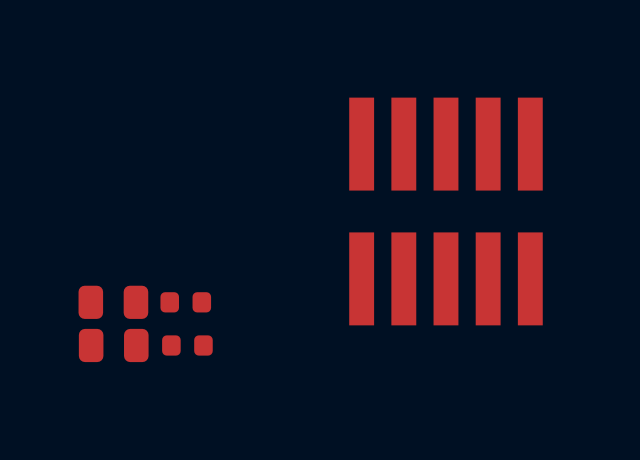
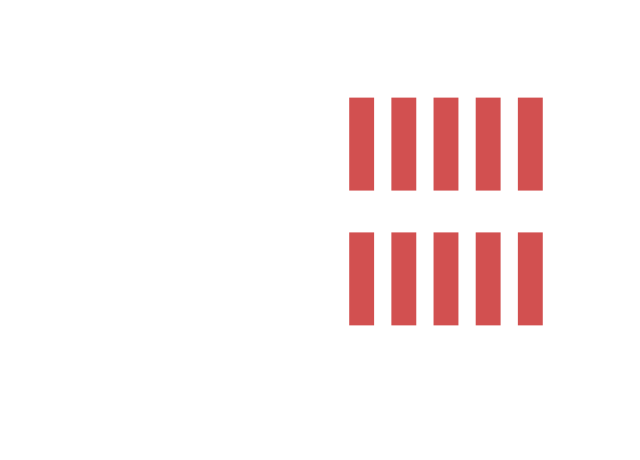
part: (113, 302) -> none
part: (185, 302) -> none
part: (113, 345) -> none
part: (187, 345) -> none

